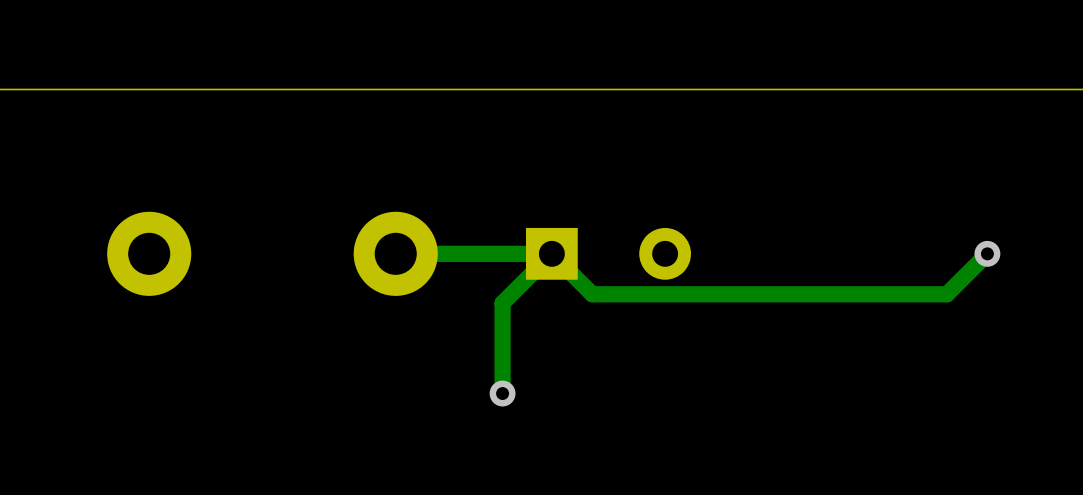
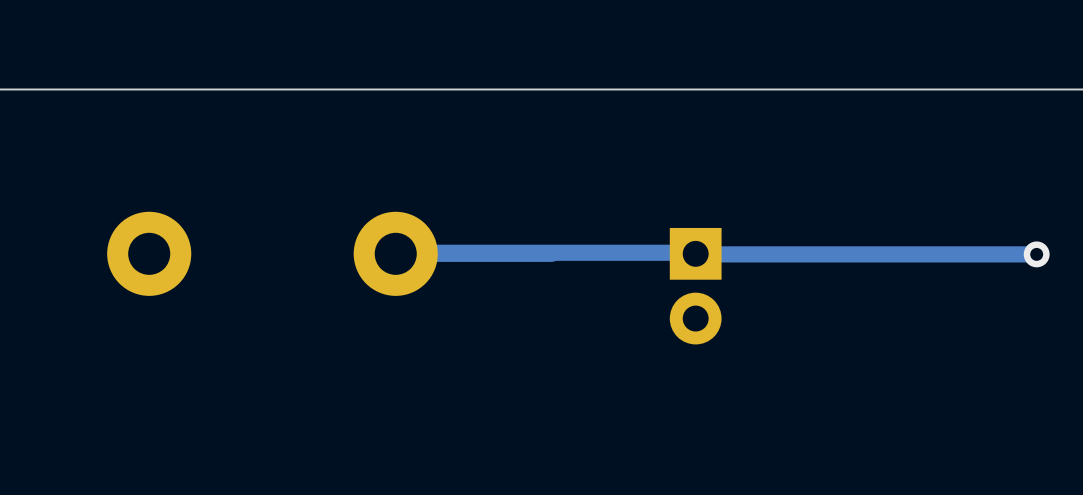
track: none -> (396, 252) (1036, 254)
part: (608, 253) -> none
track: (987, 253) (946, 294) (592, 294) (551, 253) (502, 303) (502, 393) -> none
via position: (987, 253) -> (1036, 254)
part: none -> (695, 286)
via: (502, 393) -> none

